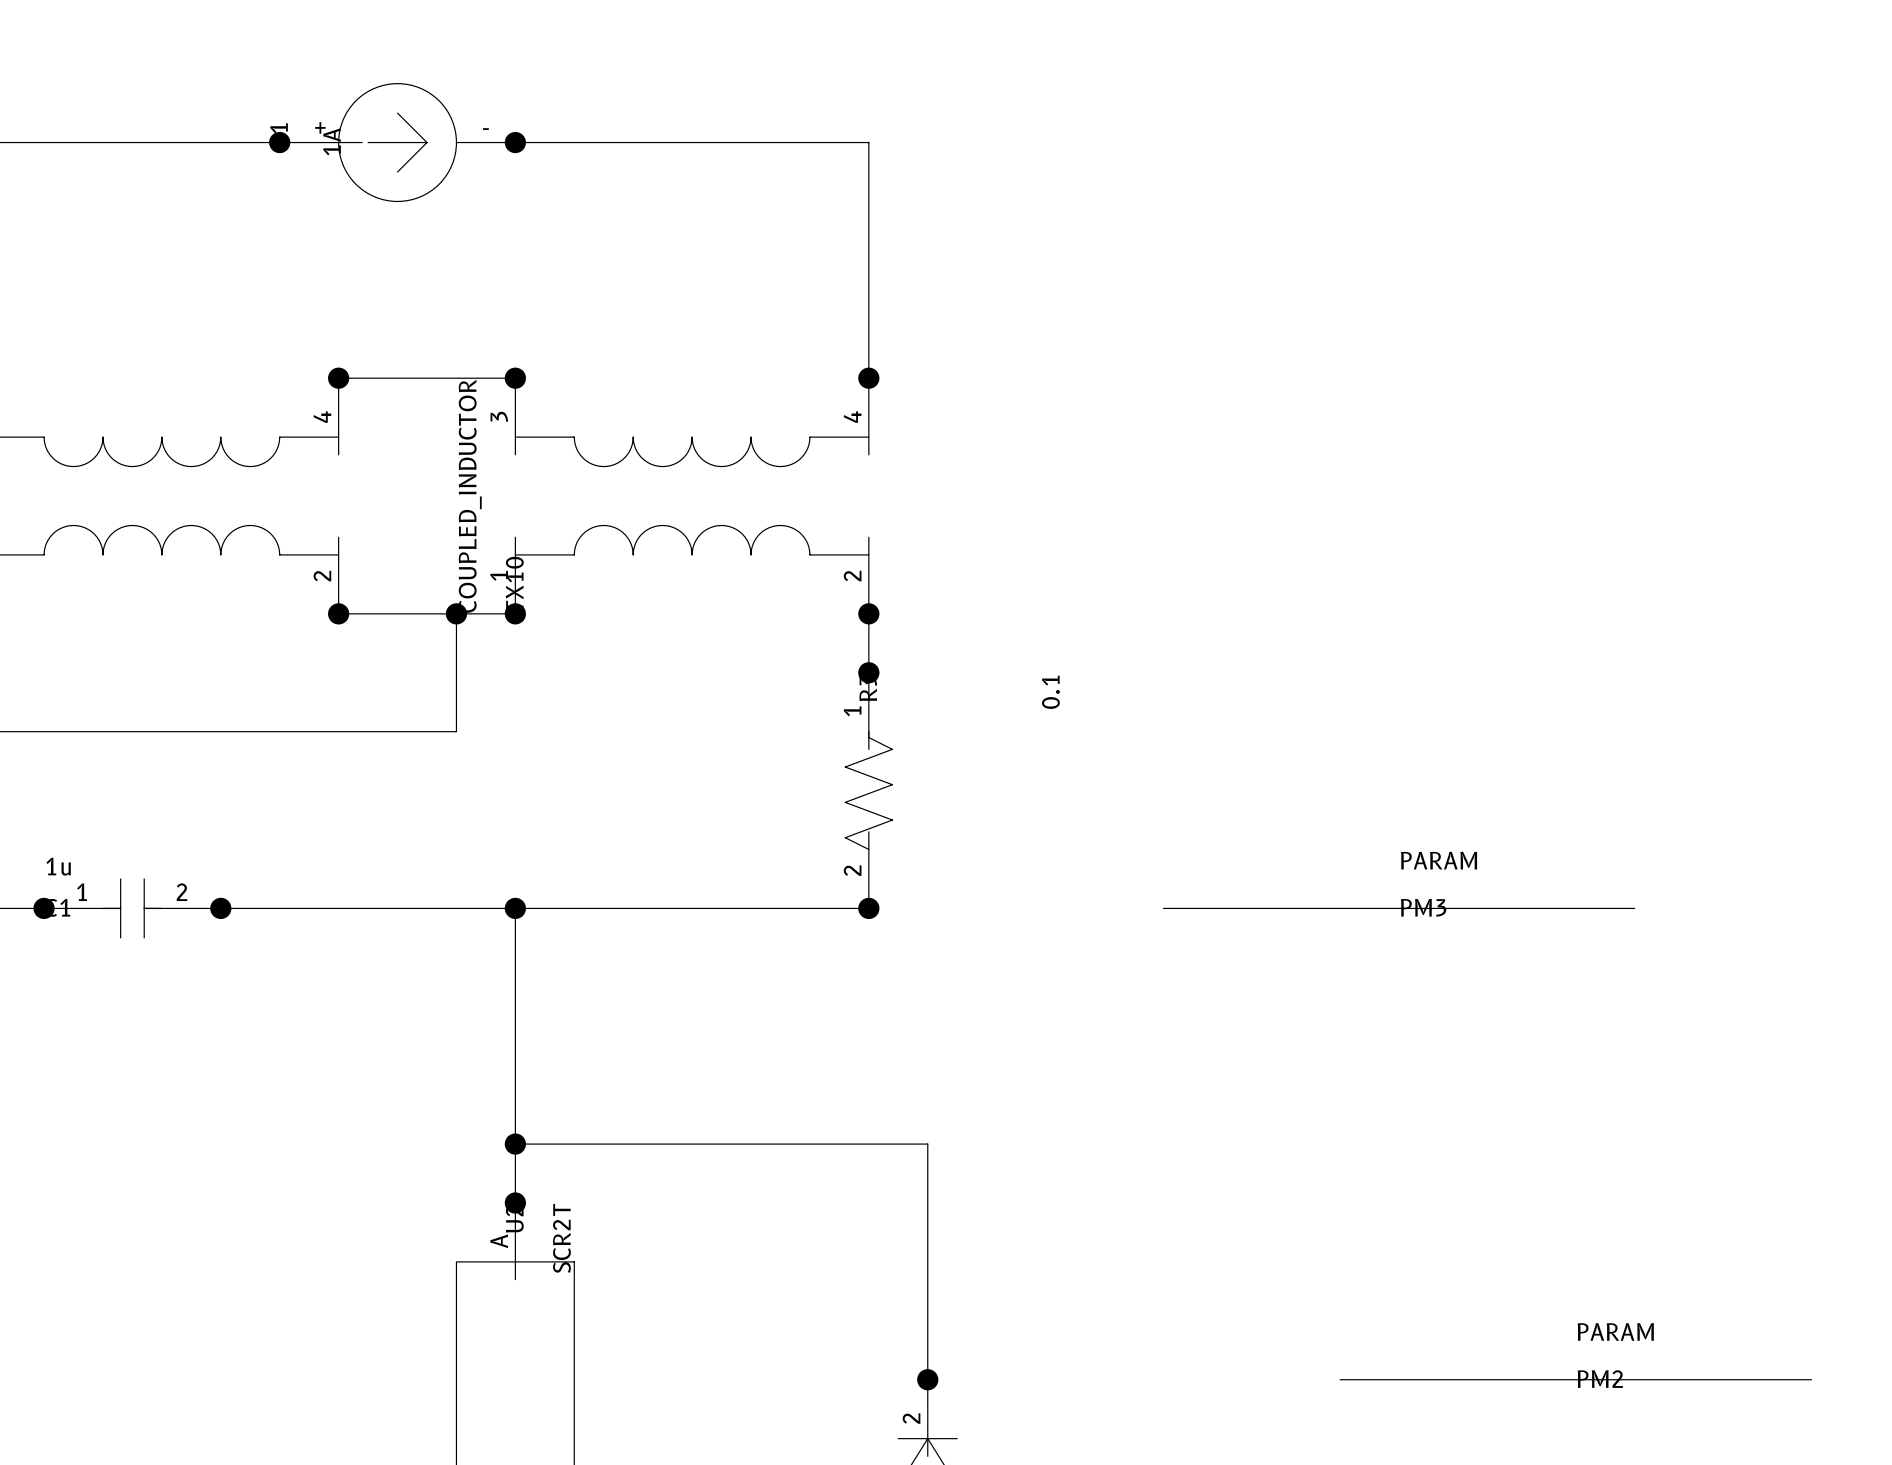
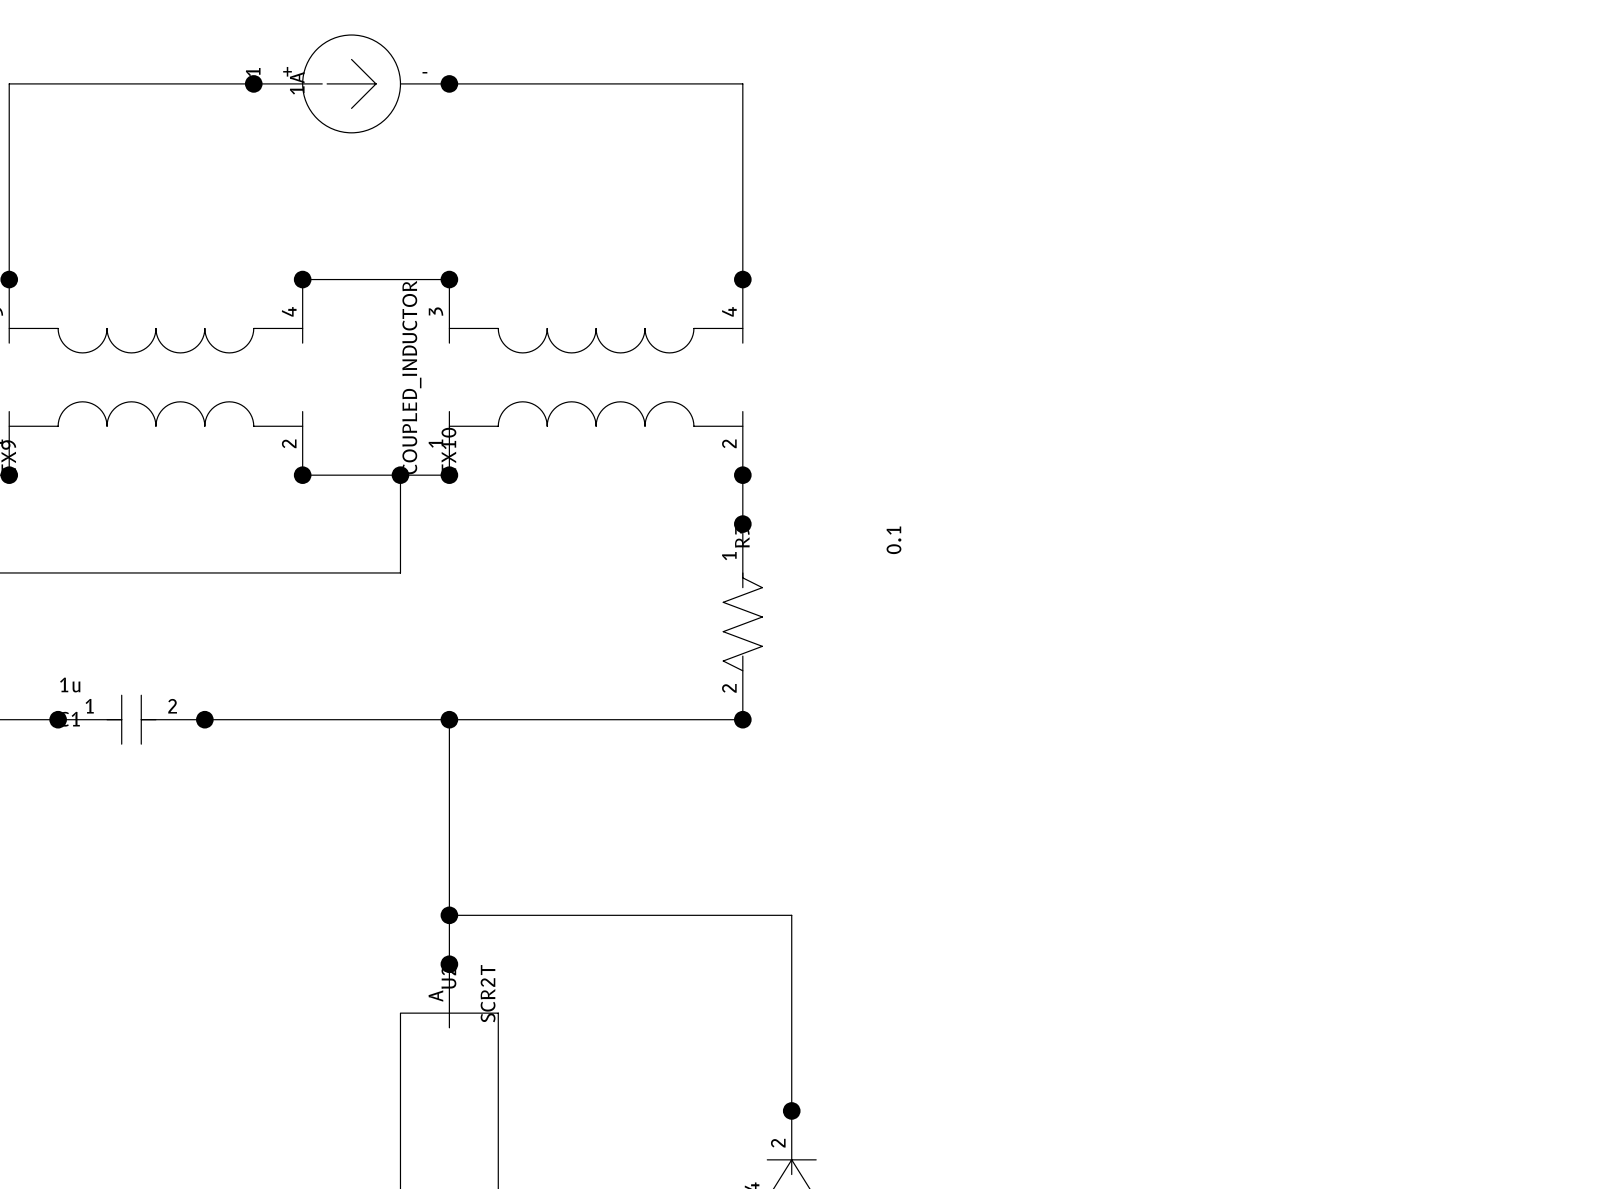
PM3: PARAM (1399, 908) -> none
PM2: PARAM (1575, 1379) -> none

